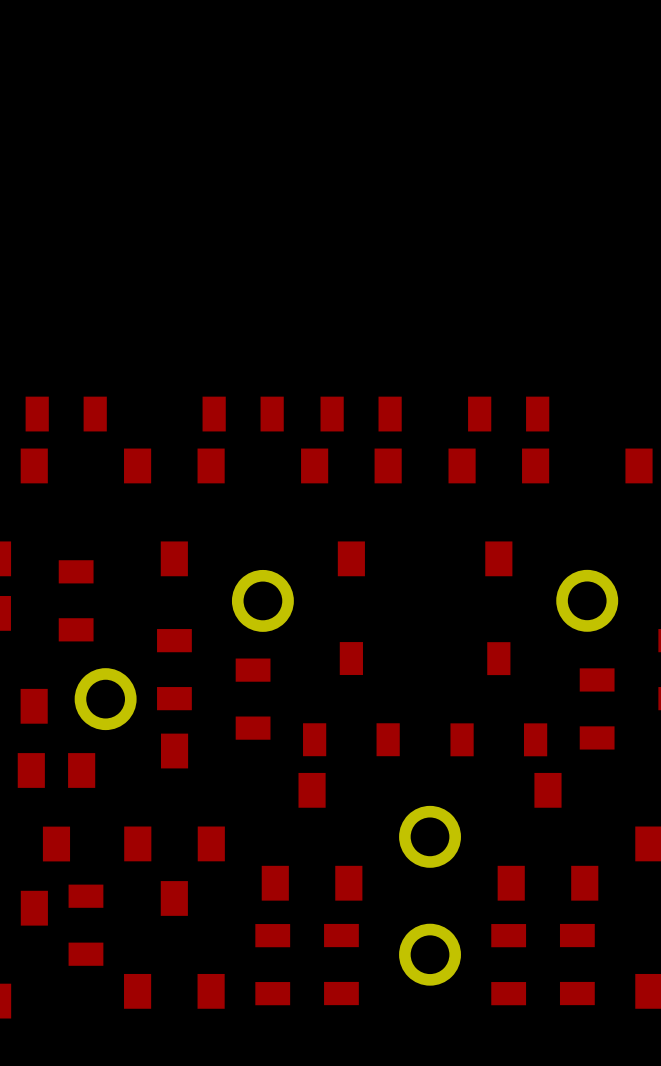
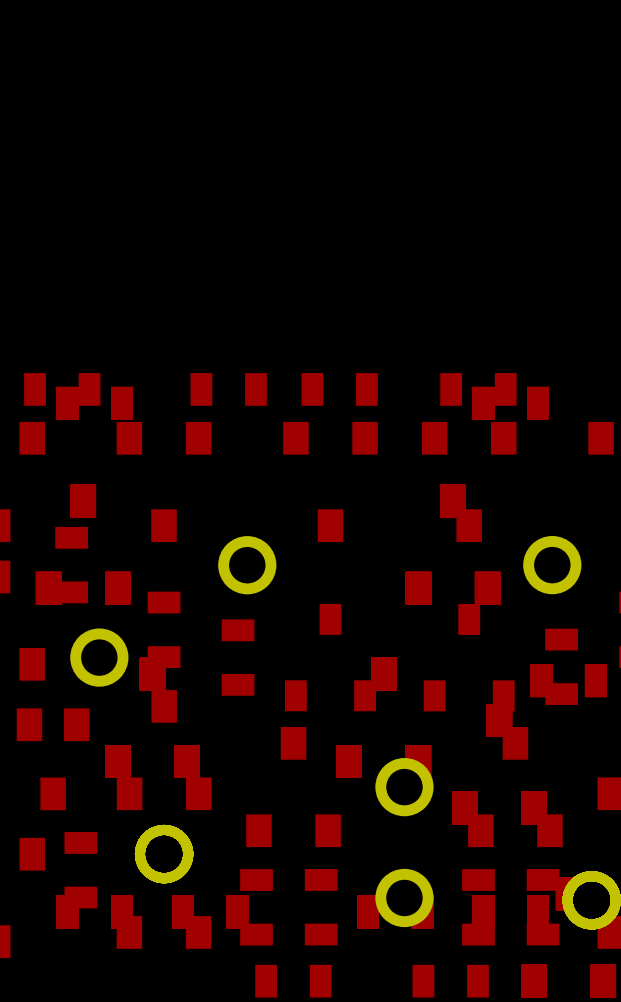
part: none -> (94, 403)
part: none -> (510, 403)
part: none -> (83, 544)
part: none -> (453, 544)
part: none -> (568, 680)
part: none -> (152, 717)
part: none -> (383, 717)
part: none -> (499, 764)
part: none -> (164, 854)
part: none -> (591, 900)
part: none -> (94, 911)
part: none -> (210, 911)
part: none -> (395, 911)
part: none -> (510, 911)
part: none -> (568, 937)
part: none -> (293, 981)
part: none -> (450, 981)

